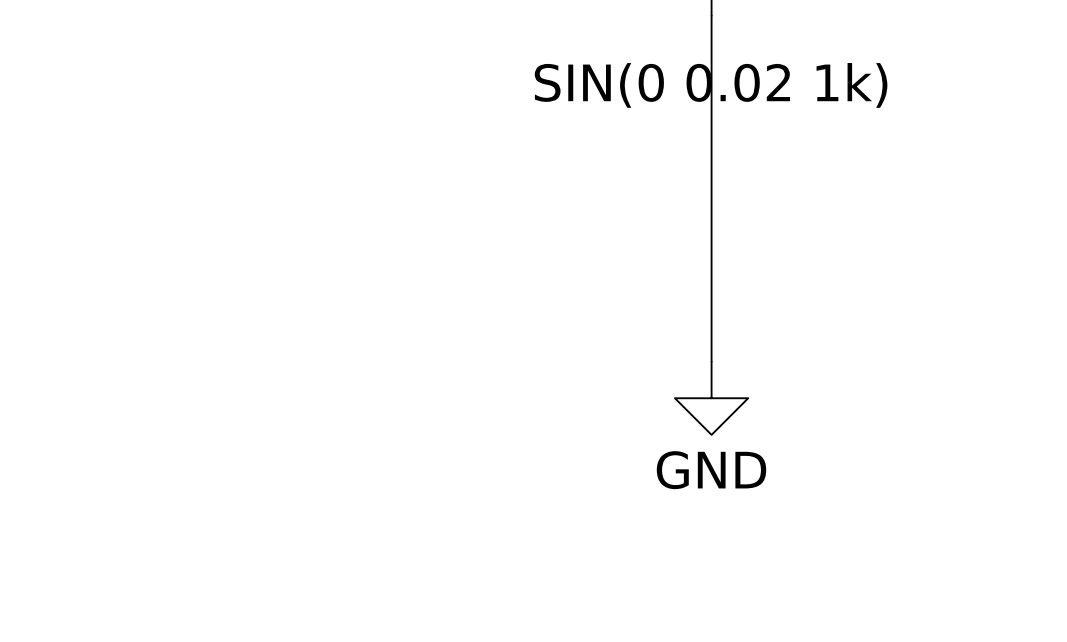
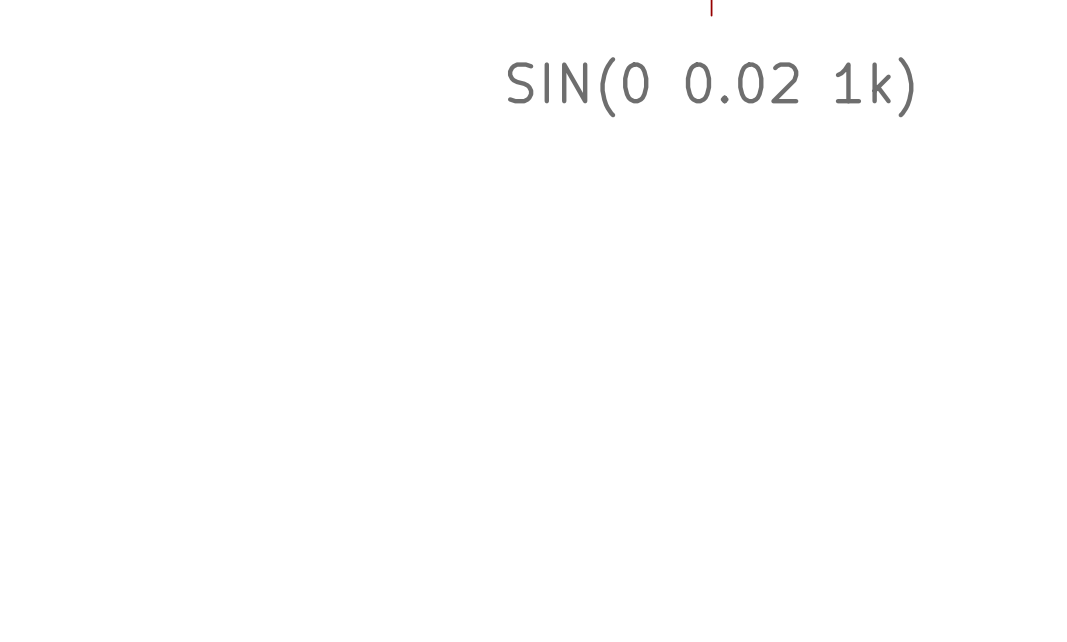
wire: (711, 15) (711, 361) -> none
power symbol: GND (711, 398) -> none

